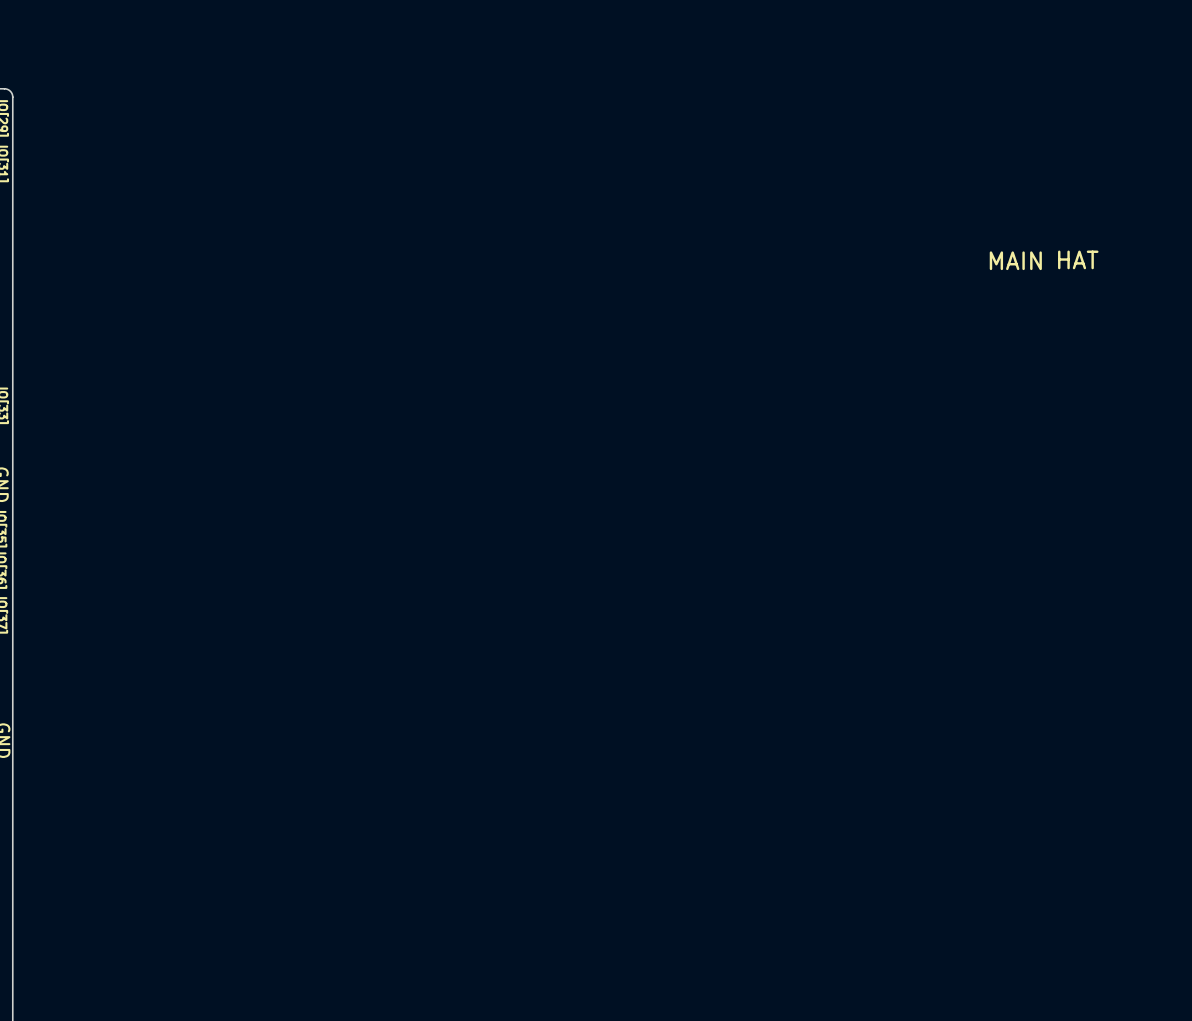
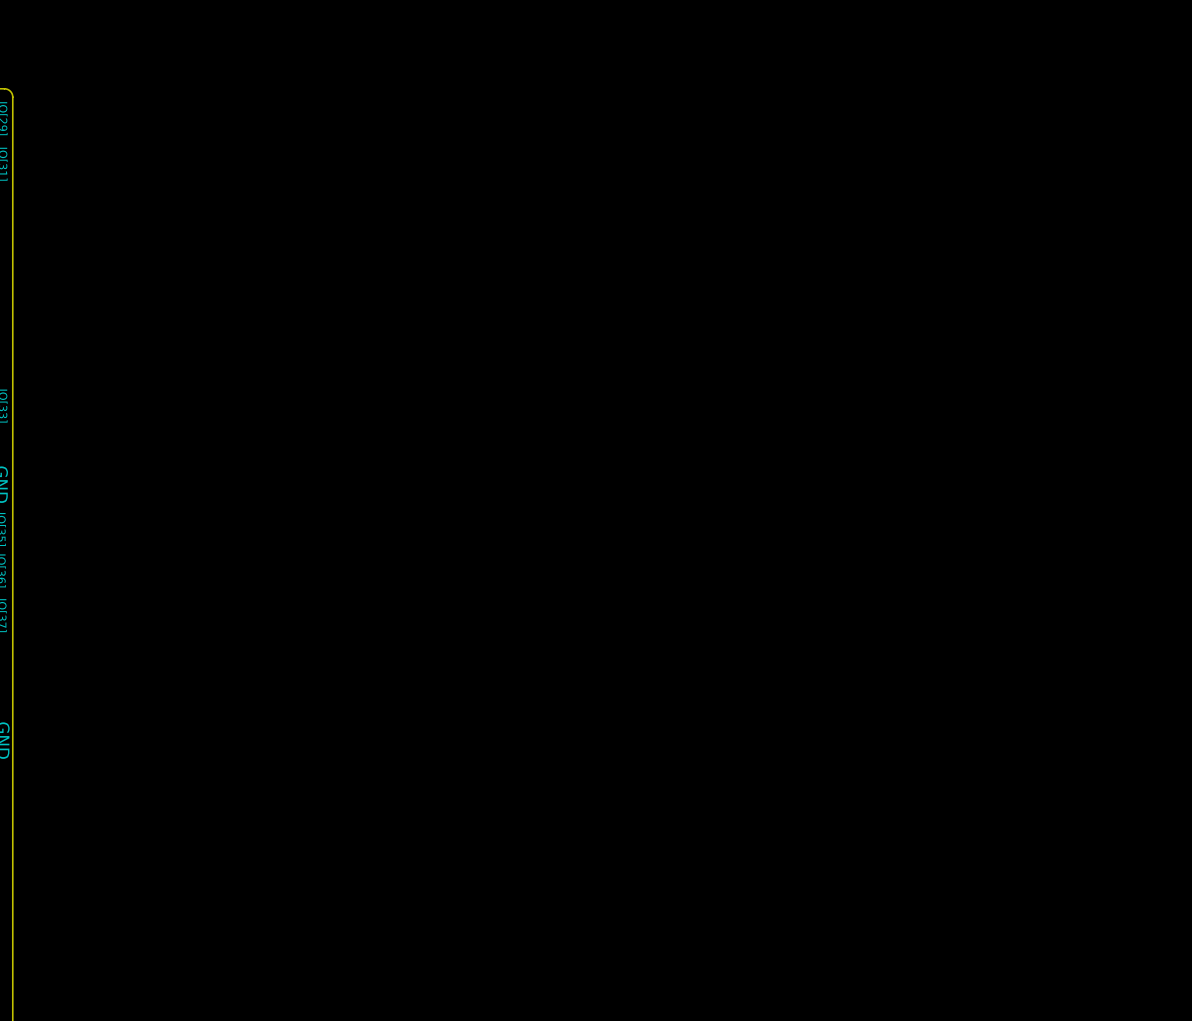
text: HAT (1078, 259) -> none
text: MAIN (1015, 260) -> none

